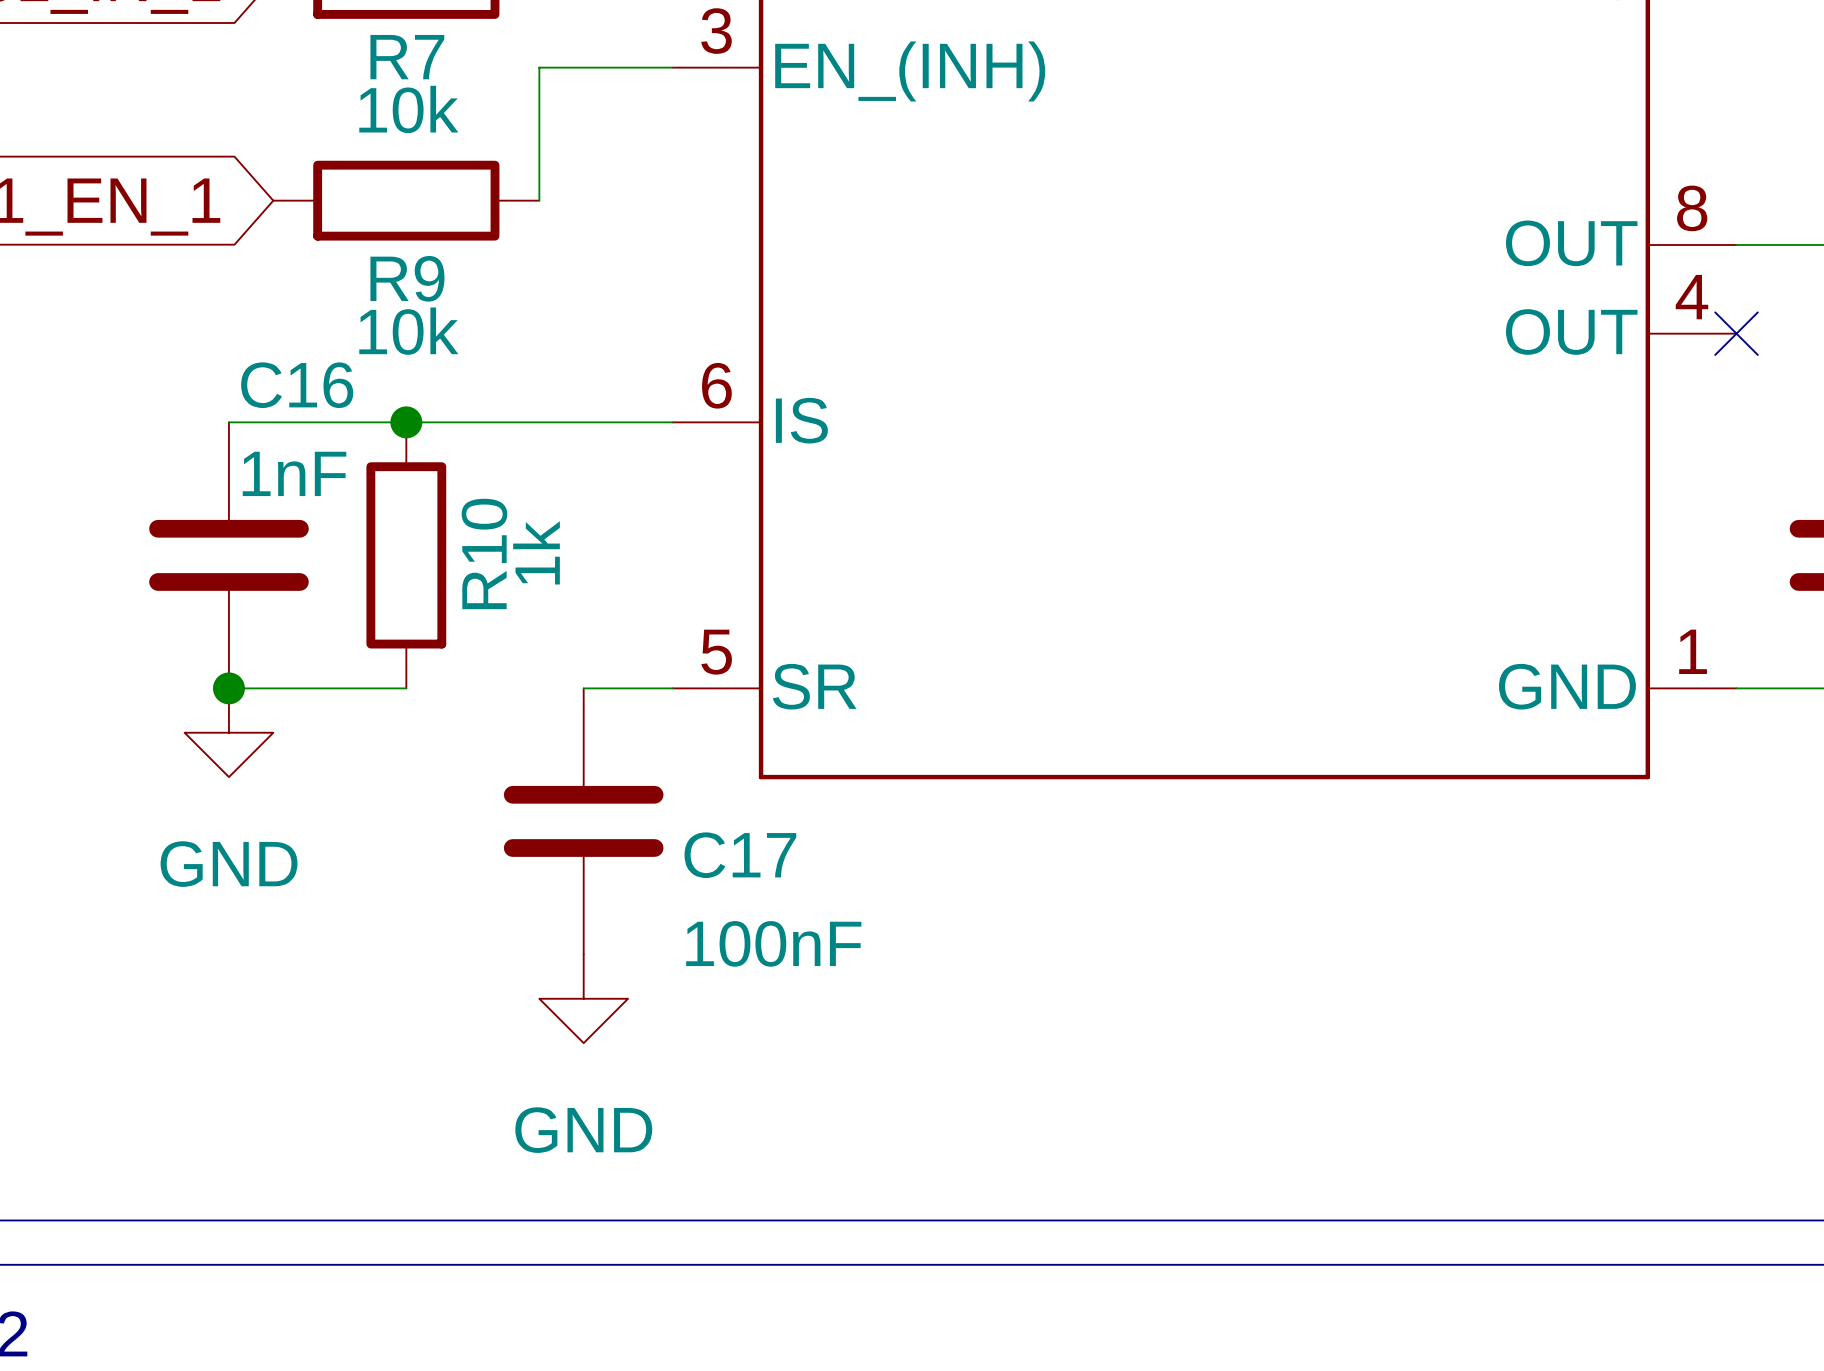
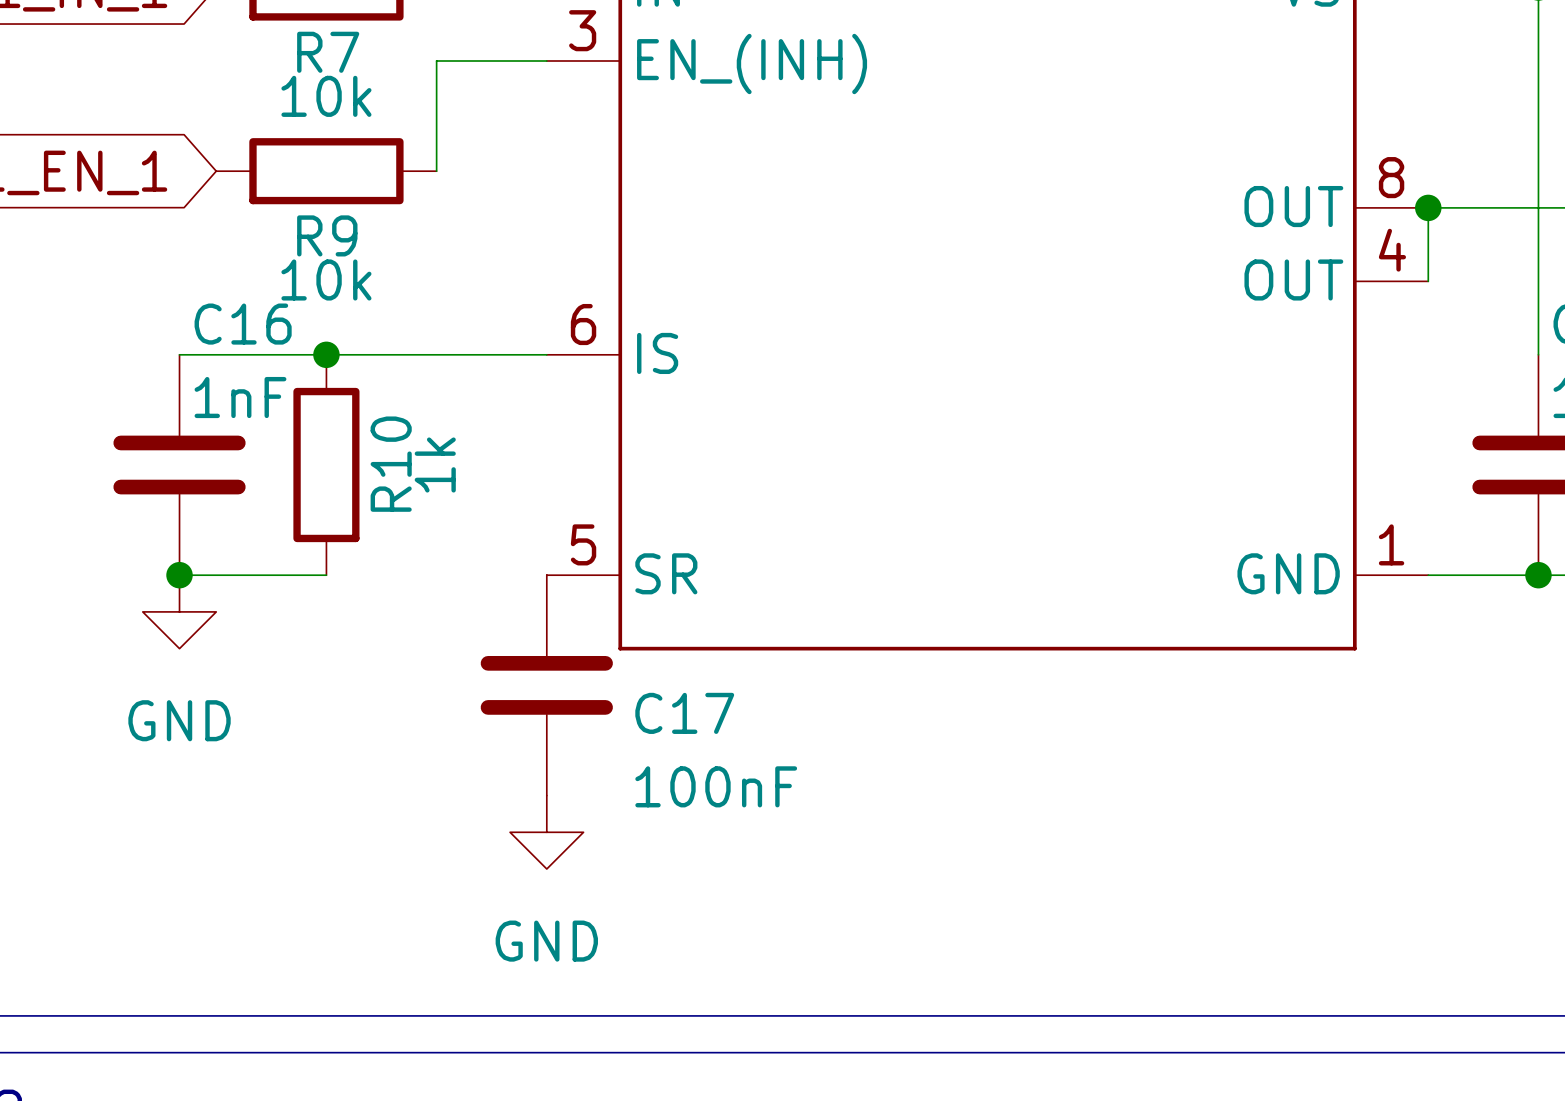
wire: none -> (1428, 207) (1428, 281)
junction: none -> (1428, 207)
no-connect mark: (1736, 333) -> none
wire: (583, 688) (672, 688) -> none
C17 position: (583, 821) -> (546, 685)
power symbol position: GND (583, 998) -> GND (546, 832)

